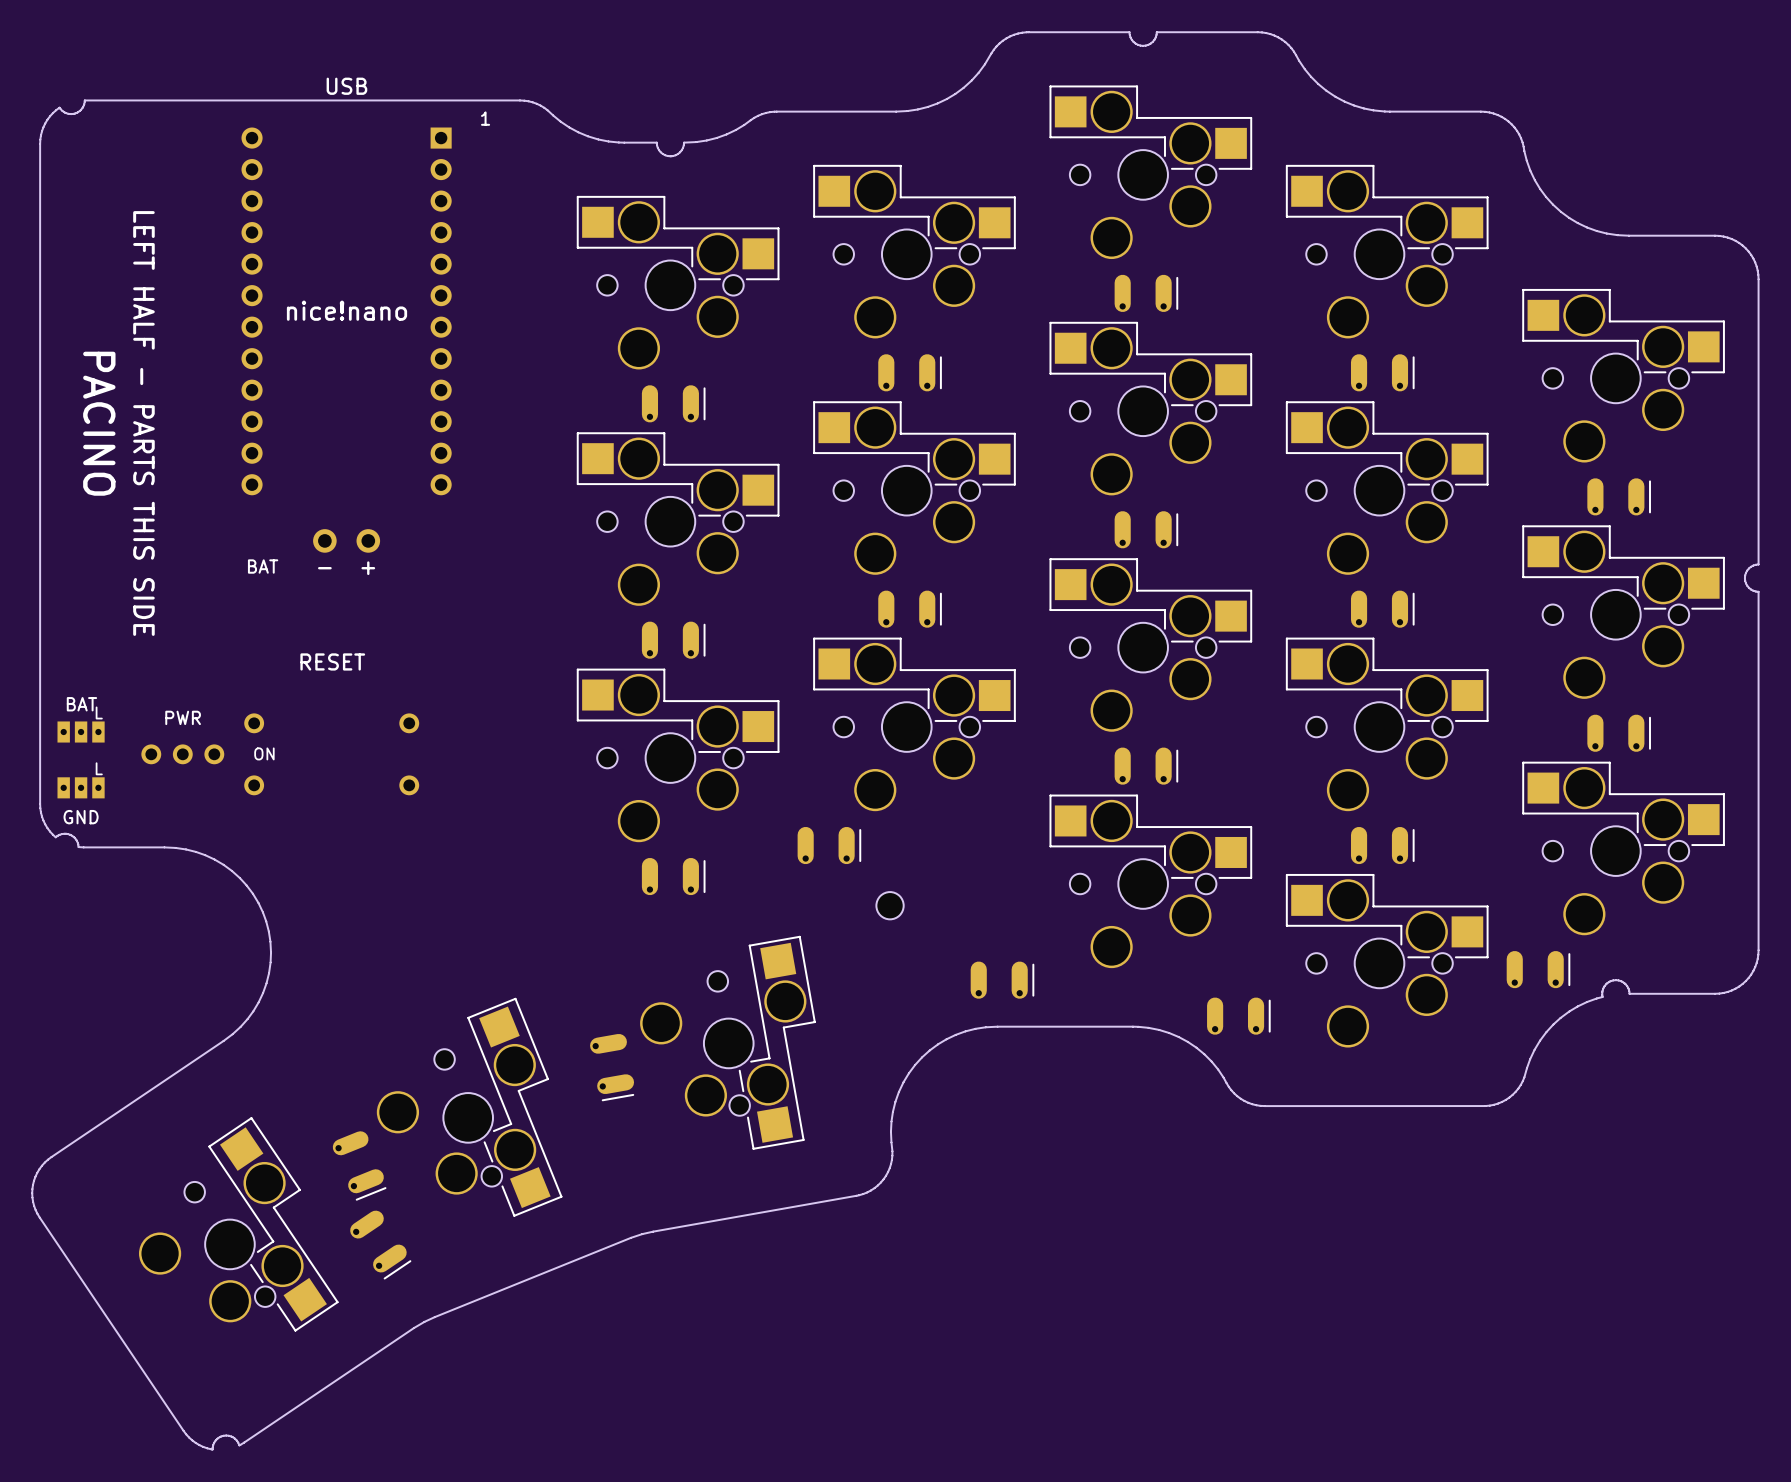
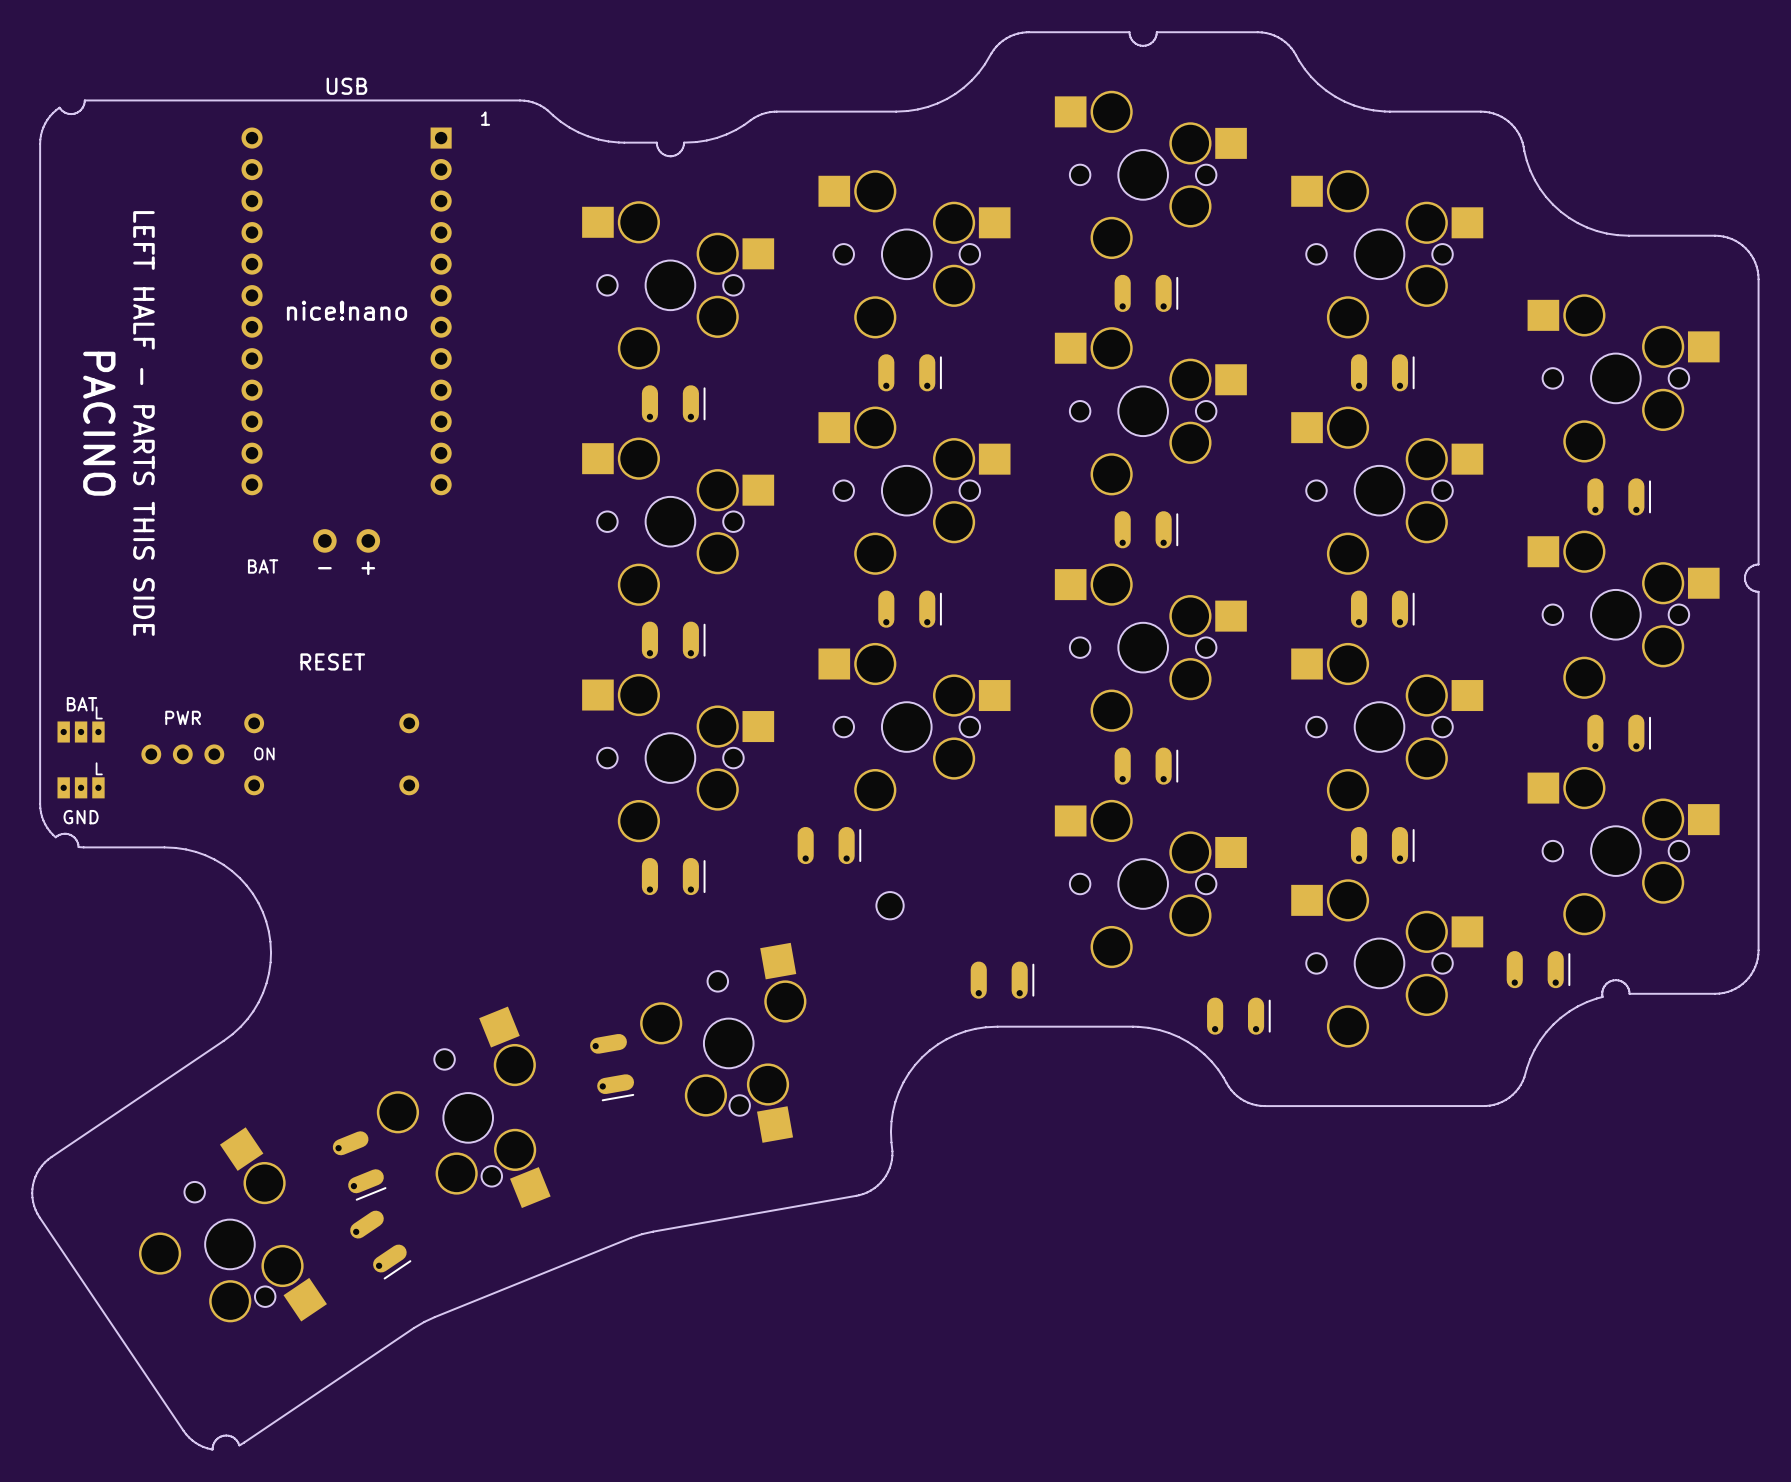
part footprint: [1049, 85, 1253, 260] -> [1054, 90, 1247, 260]
part footprint: [813, 164, 1016, 339] -> [818, 170, 1011, 339]
part footprint: [1285, 164, 1489, 339] -> [1291, 170, 1484, 339]
part footprint: [576, 195, 780, 370] -> [582, 201, 775, 370]
part footprint: [1522, 288, 1725, 463] -> [1527, 294, 1720, 463]
part footprint: [1049, 321, 1253, 496] -> [1054, 327, 1247, 496]
part footprint: [813, 401, 1016, 575] -> [818, 406, 1011, 575]
part footprint: [1285, 401, 1489, 575] -> [1291, 406, 1484, 575]
part footprint: [576, 432, 780, 606] -> [582, 437, 775, 606]
part footprint: [1522, 525, 1725, 699] -> [1527, 530, 1720, 699]
part footprint: [1049, 558, 1253, 732] -> [1054, 563, 1247, 732]
part footprint: [813, 637, 1016, 812] -> [818, 642, 1011, 812]
part footprint: [1285, 637, 1489, 812] -> [1291, 642, 1484, 812]
part footprint: [576, 668, 780, 843] -> [582, 673, 775, 843]
part footprint: [1522, 761, 1725, 936] -> [1527, 766, 1720, 936]
part footprint: [1049, 794, 1253, 969] -> [1054, 799, 1247, 969]
part footprint: [1285, 874, 1489, 1048] -> [1291, 879, 1484, 1048]
part footprint: [640, 935, 816, 1150] -> [640, 942, 807, 1143]
part footprint: [376, 997, 563, 1217] -> [376, 1006, 551, 1209]
part footprint: [138, 1117, 339, 1332] -> [138, 1127, 327, 1323]

